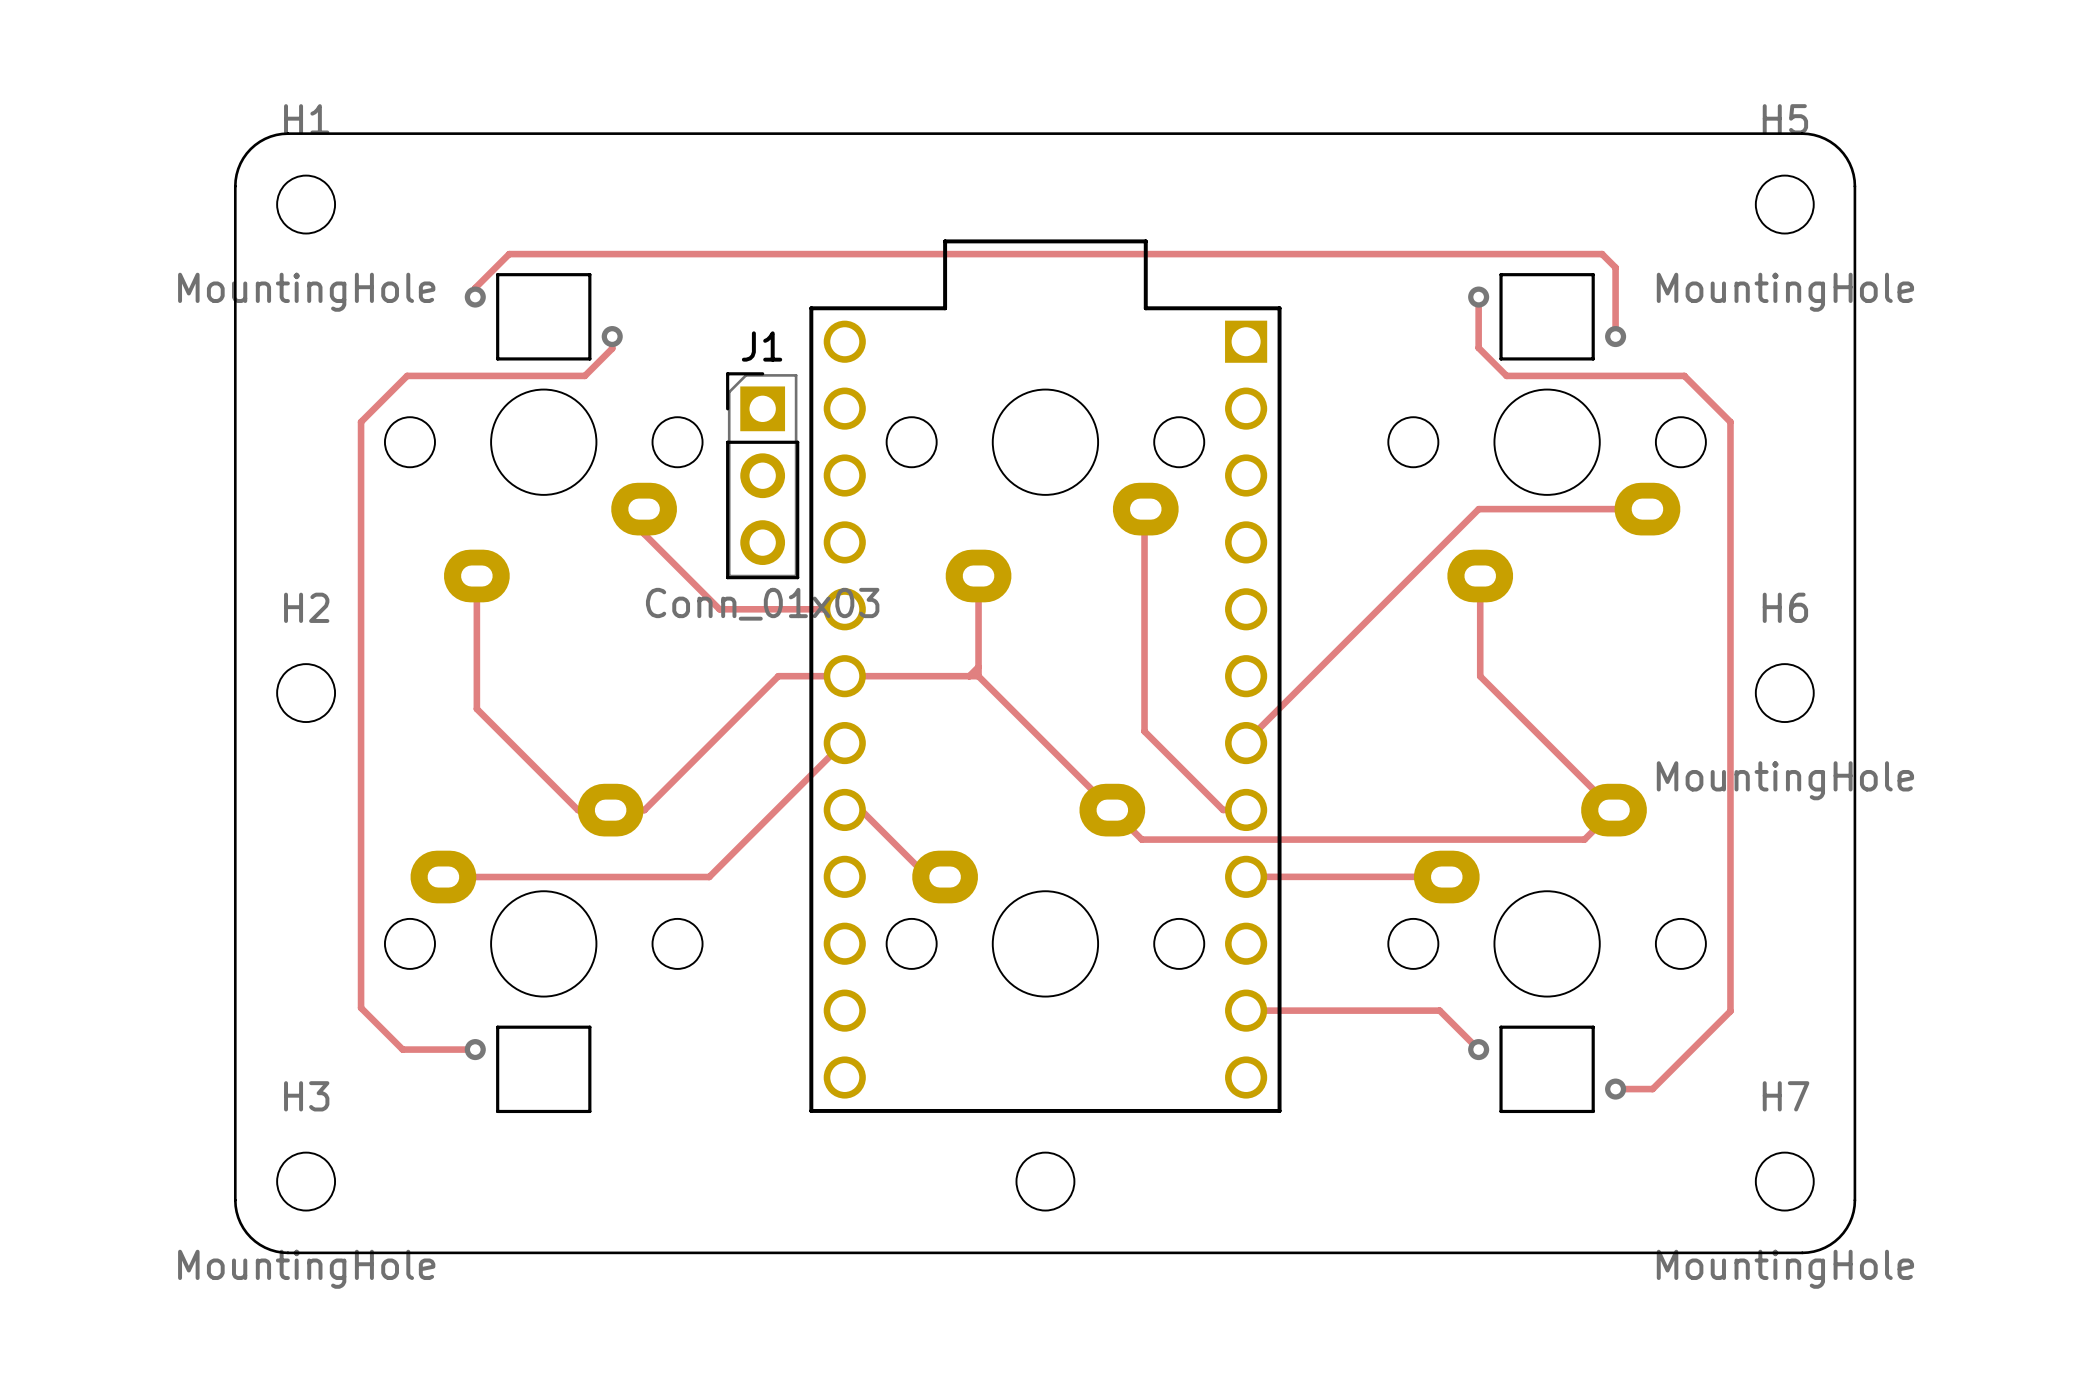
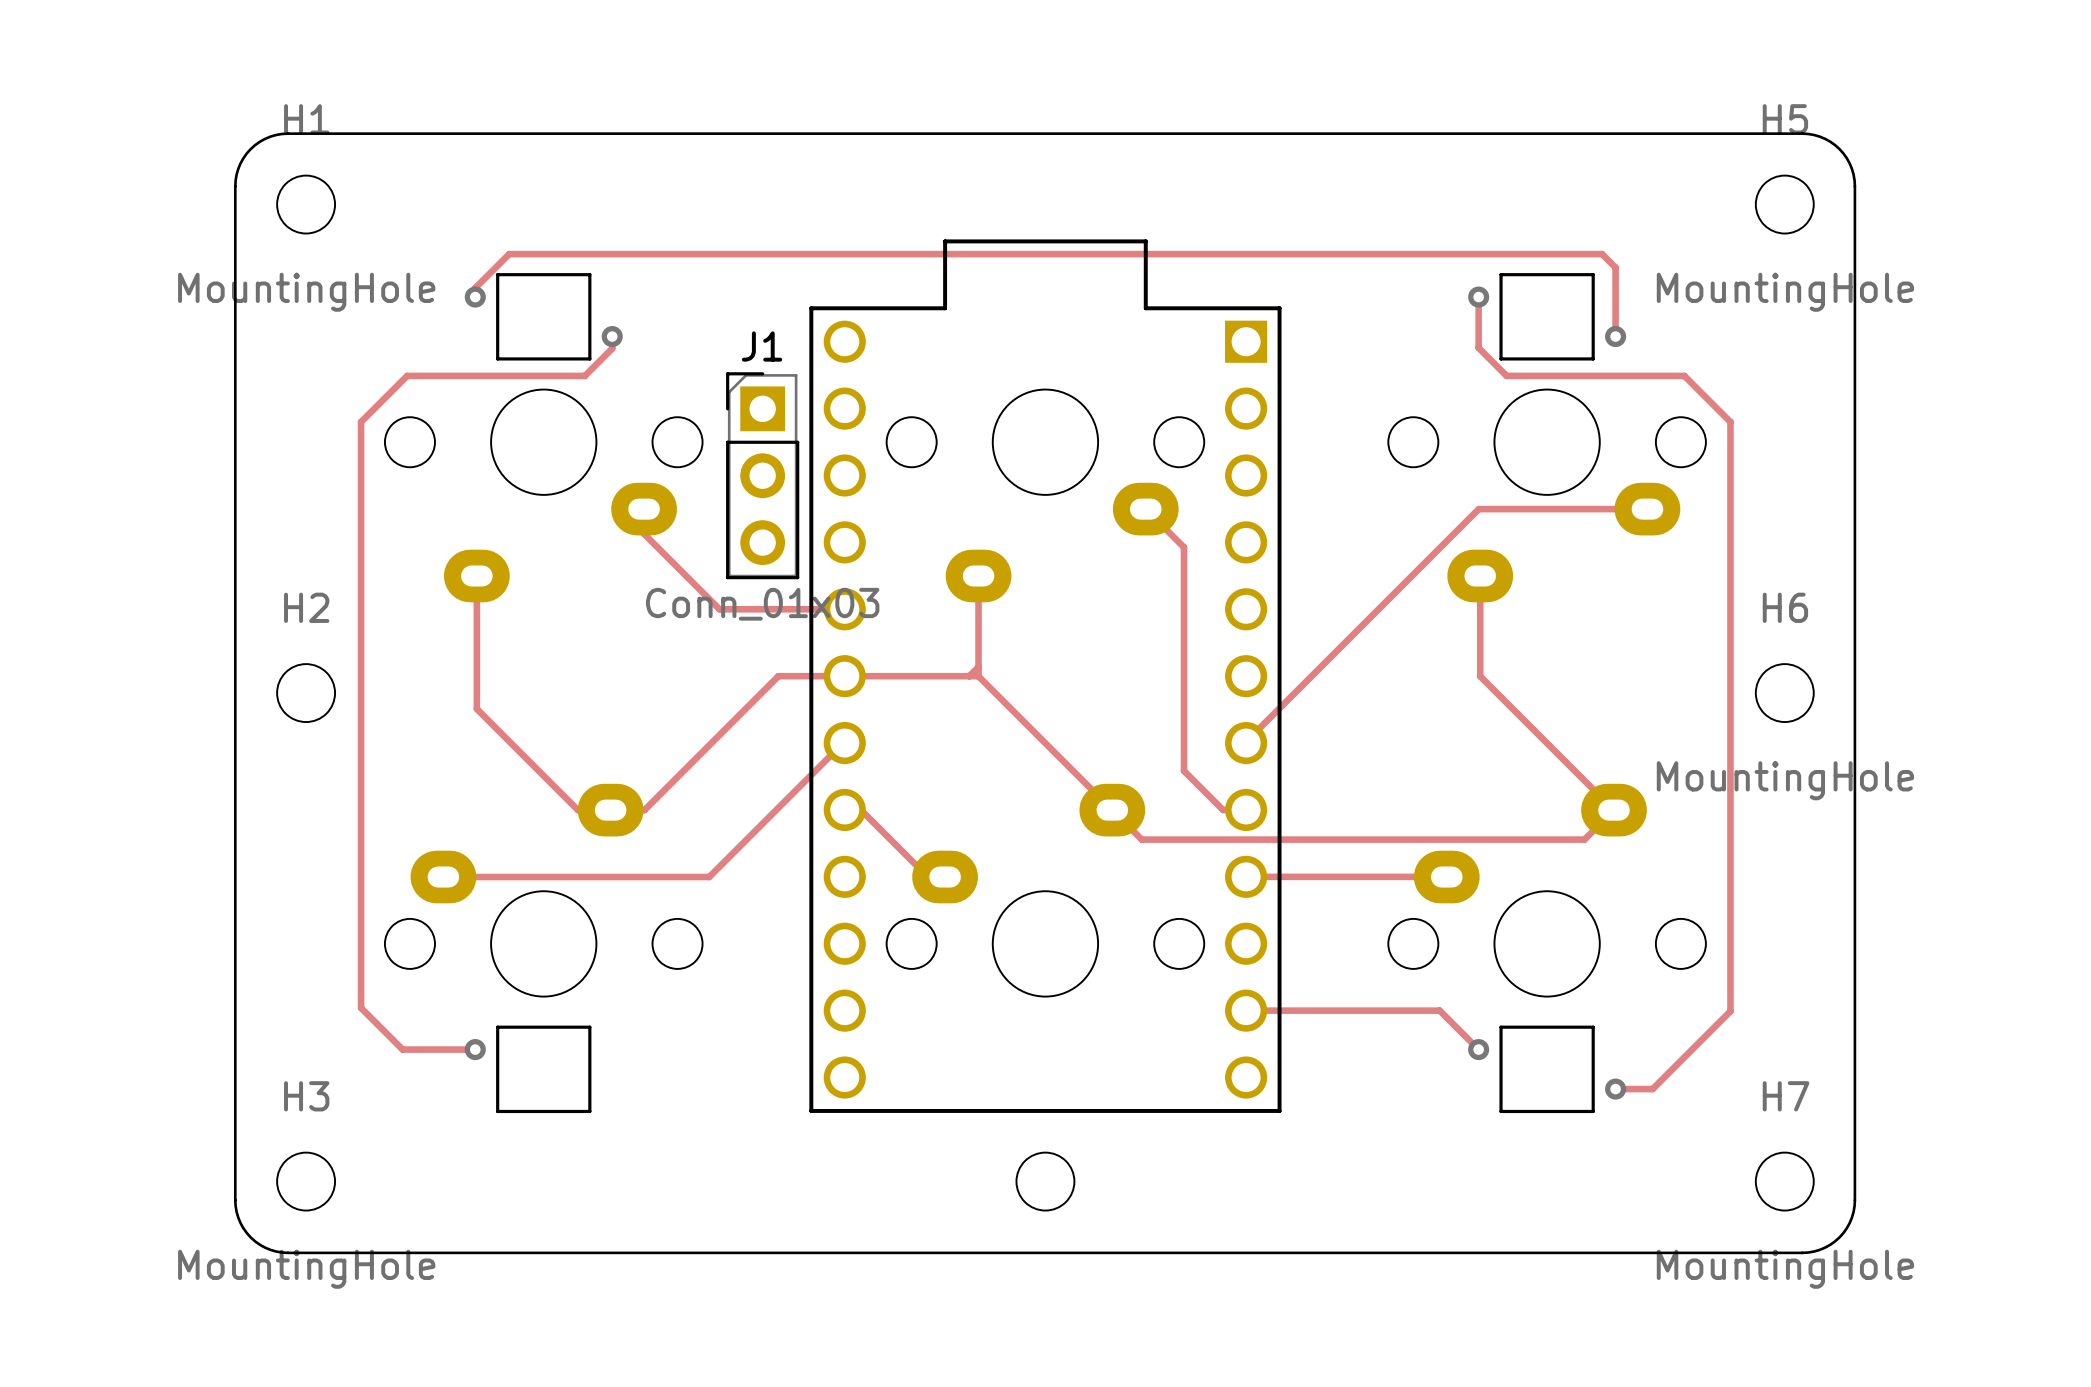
track: (1145, 509) (1144, 731) (1184, 770) -> (1145, 509) (1184, 547) (1184, 770)

